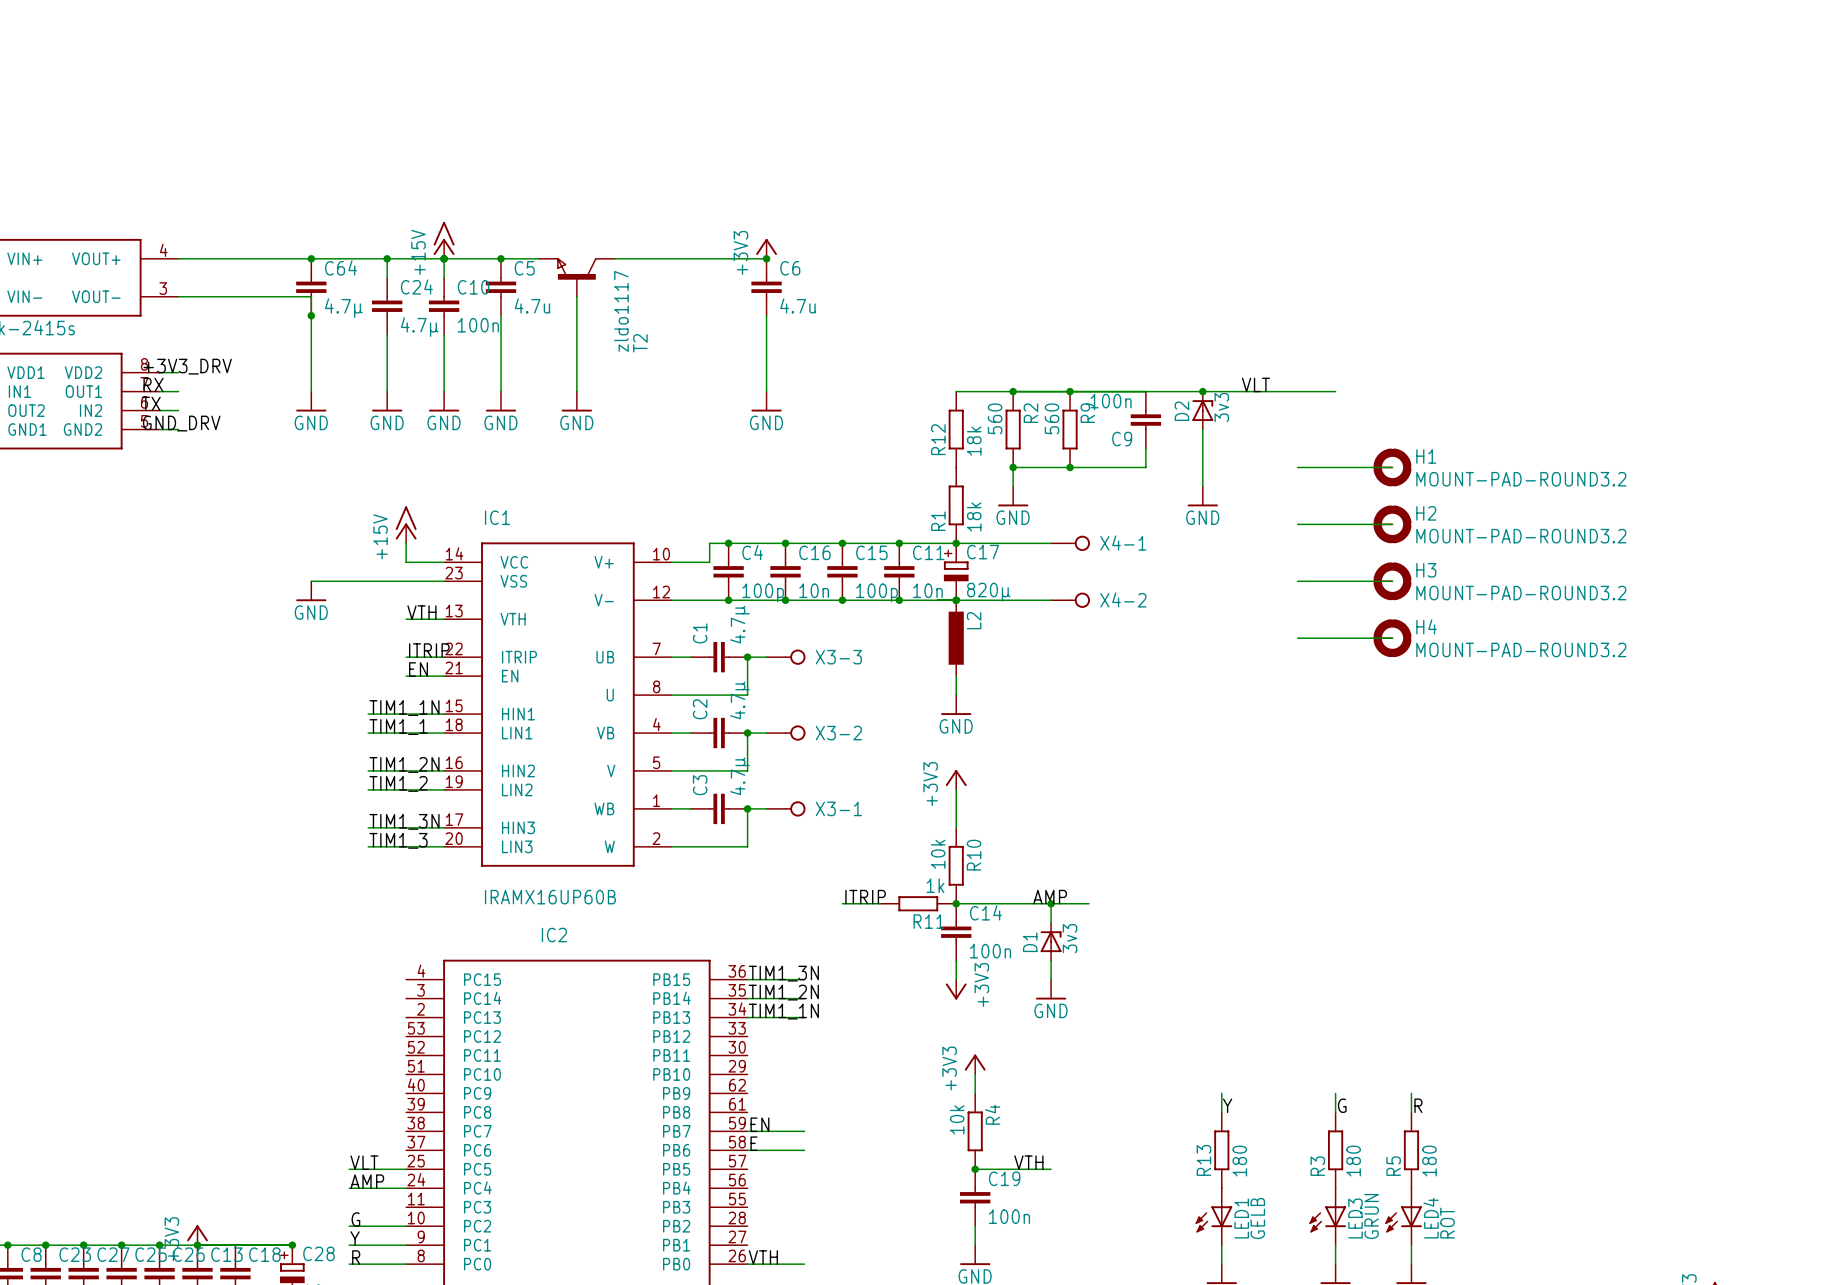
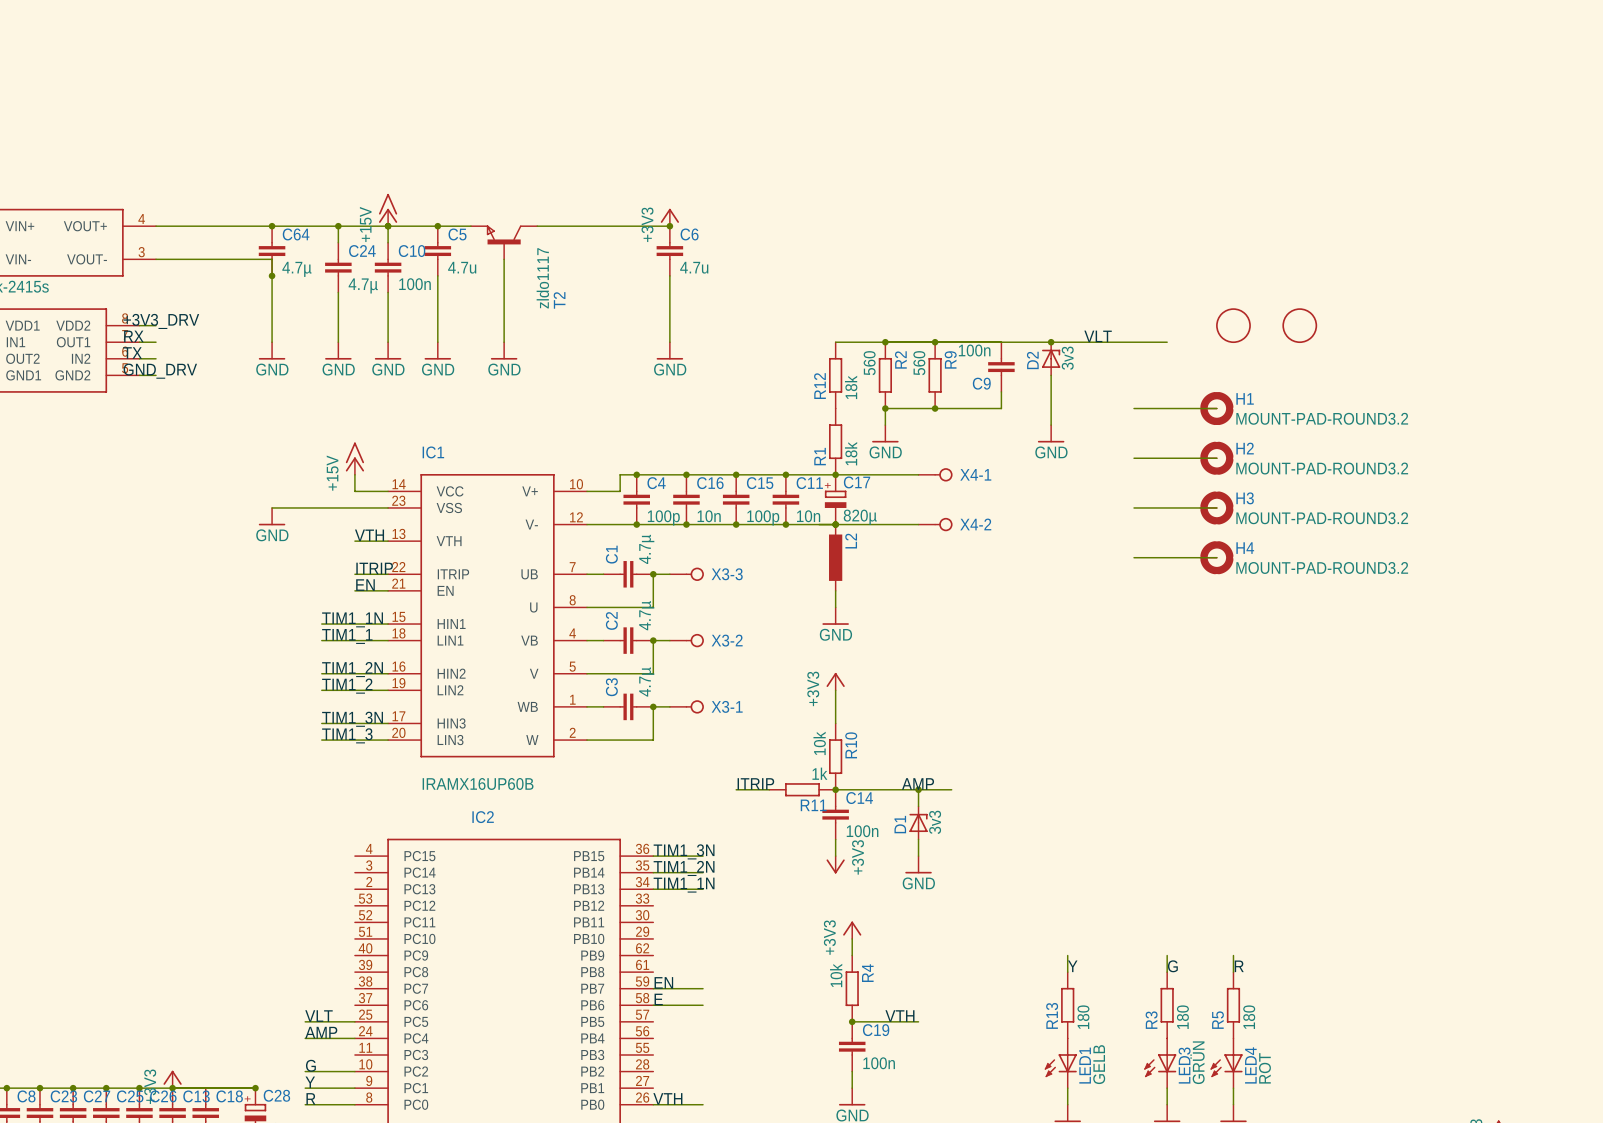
part: none -> (1233, 325)
part: none -> (1299, 325)

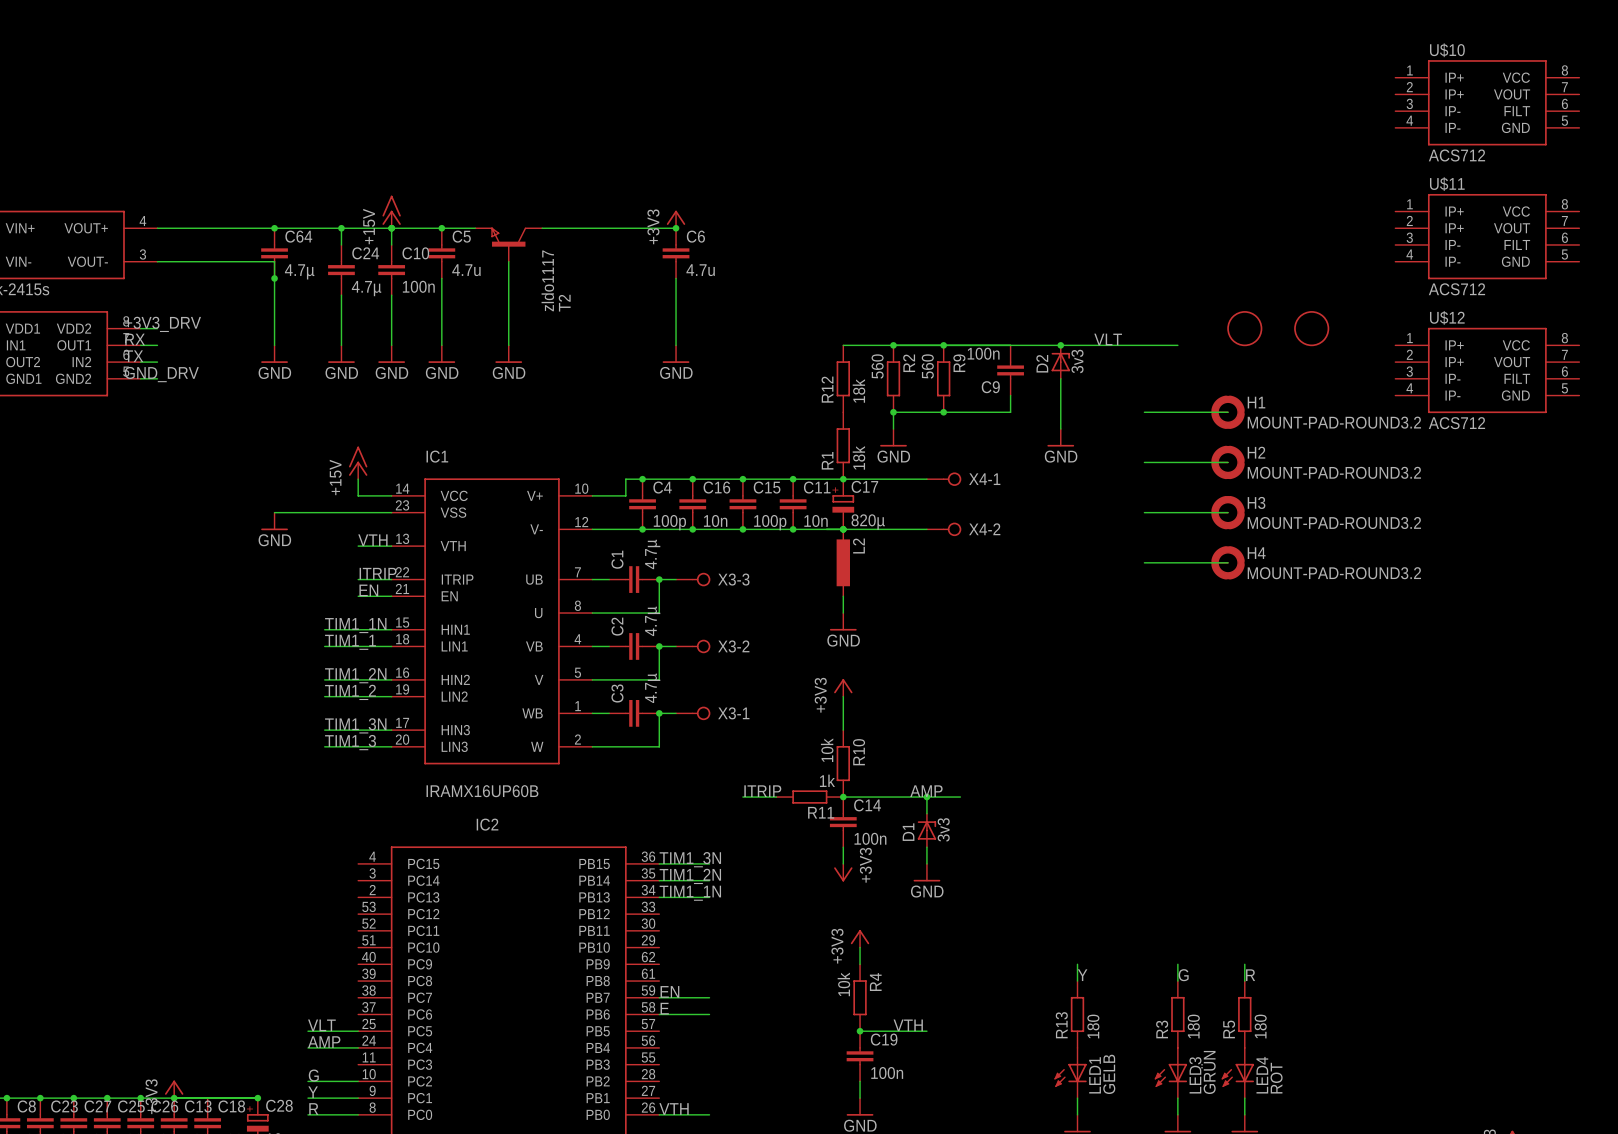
U$10: none -> ACS712 (1487, 102)
U$11: none -> ACS712 (1487, 236)
U$12: none -> ACS712 (1487, 370)

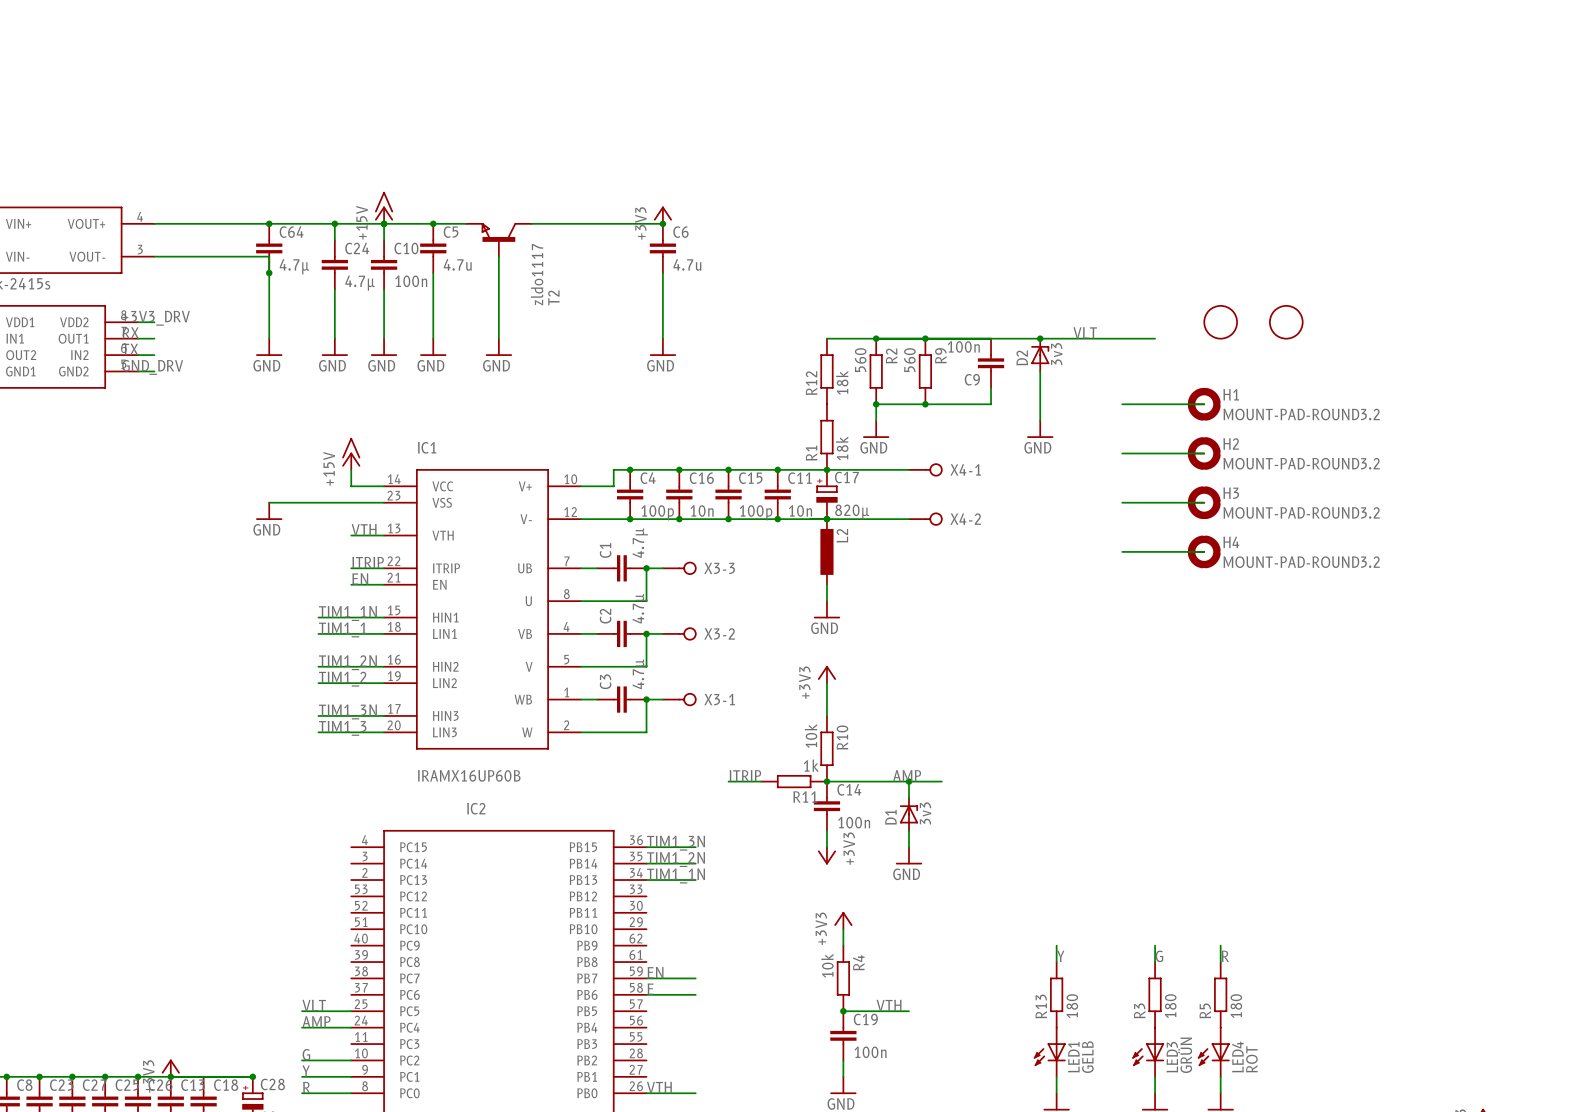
U$10: ACS712 (1487, 102) -> none
U$11: ACS712 (1487, 236) -> none
U$12: ACS712 (1487, 370) -> none

